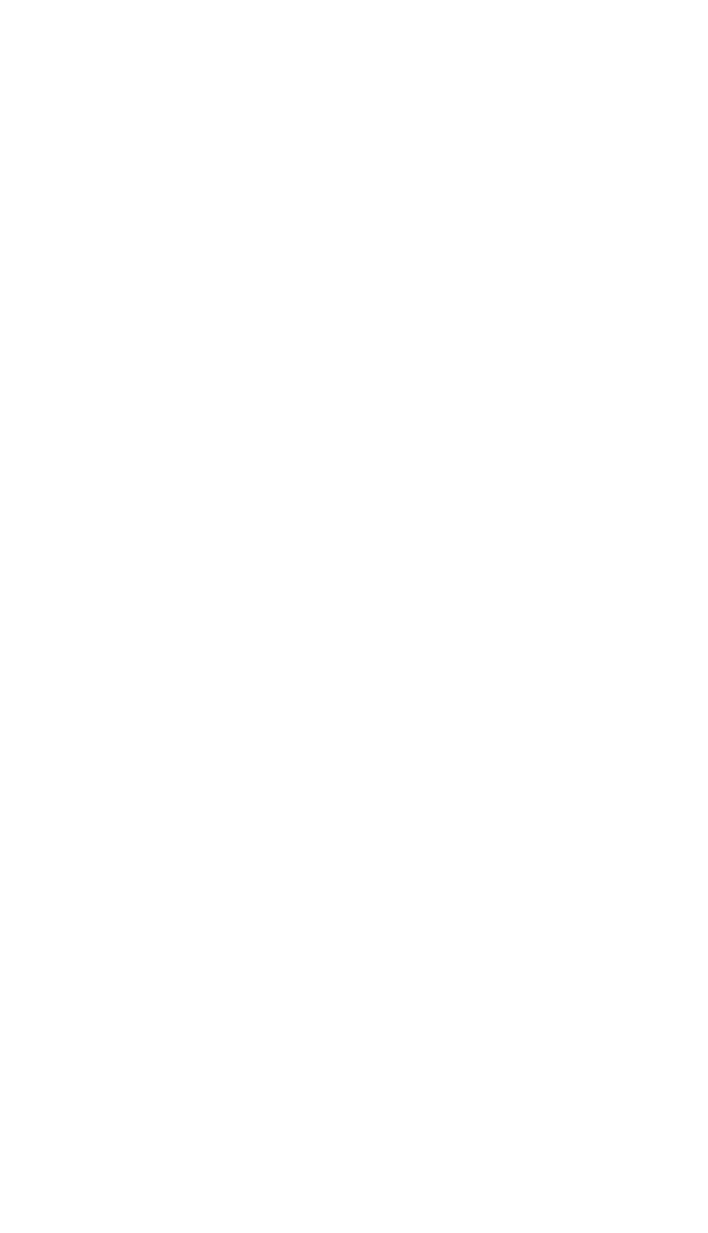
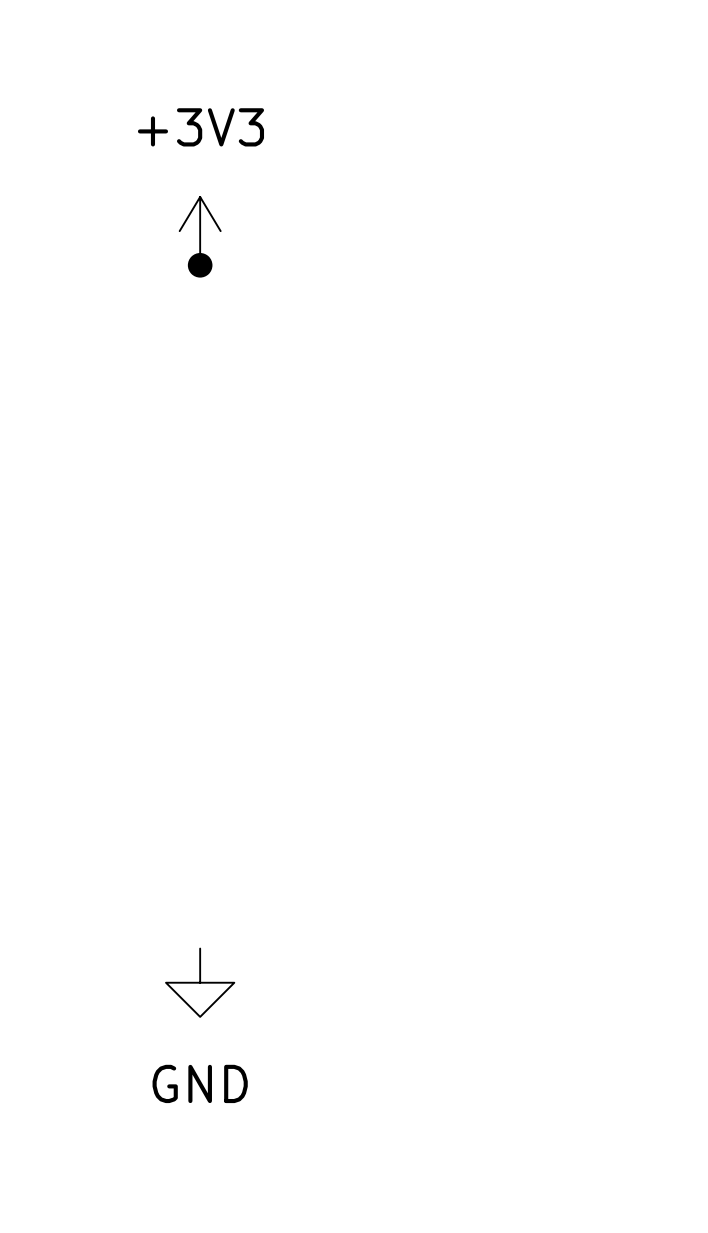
power symbol: none -> +3V3 (200, 231)
junction: none -> (200, 265)
power symbol: none -> GND (200, 982)

